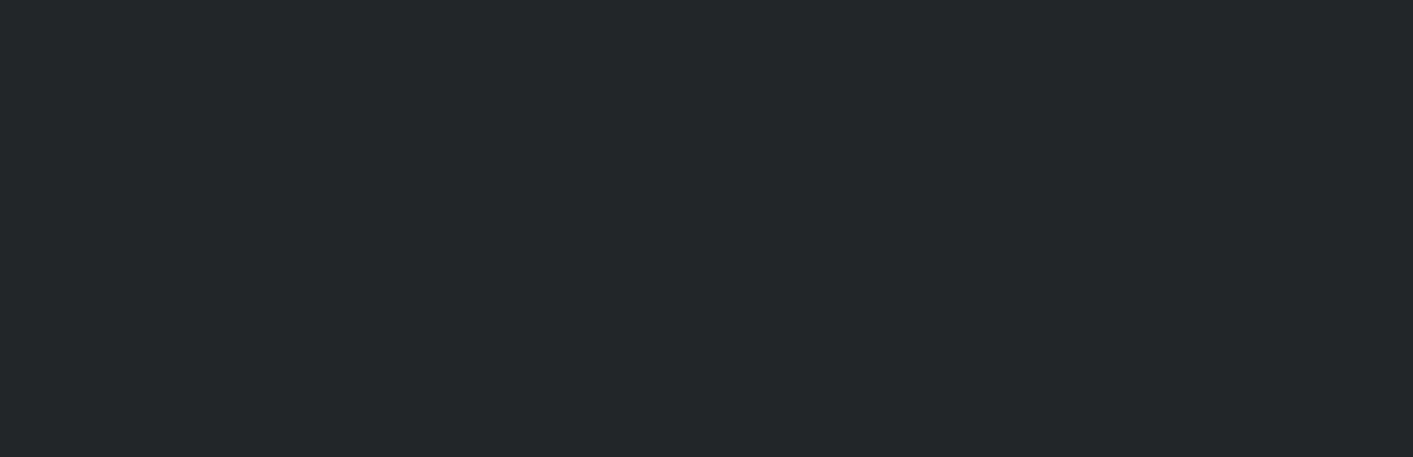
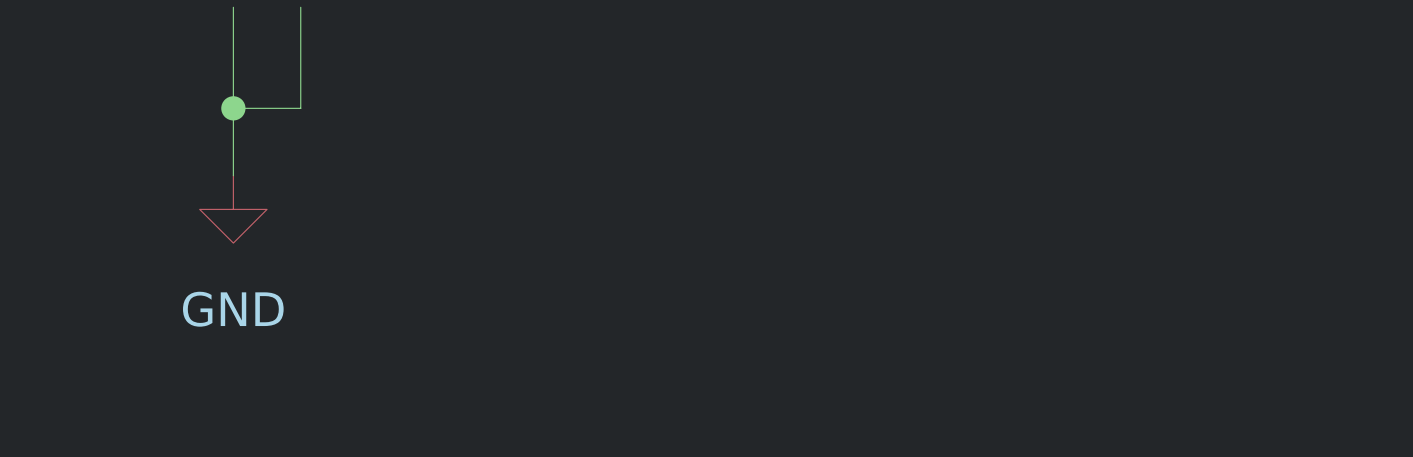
wire: none -> (233, 7) (233, 175)
wire: none -> (300, 7) (300, 108) (233, 108)
junction: none -> (233, 108)
power symbol: none -> GND (233, 209)

